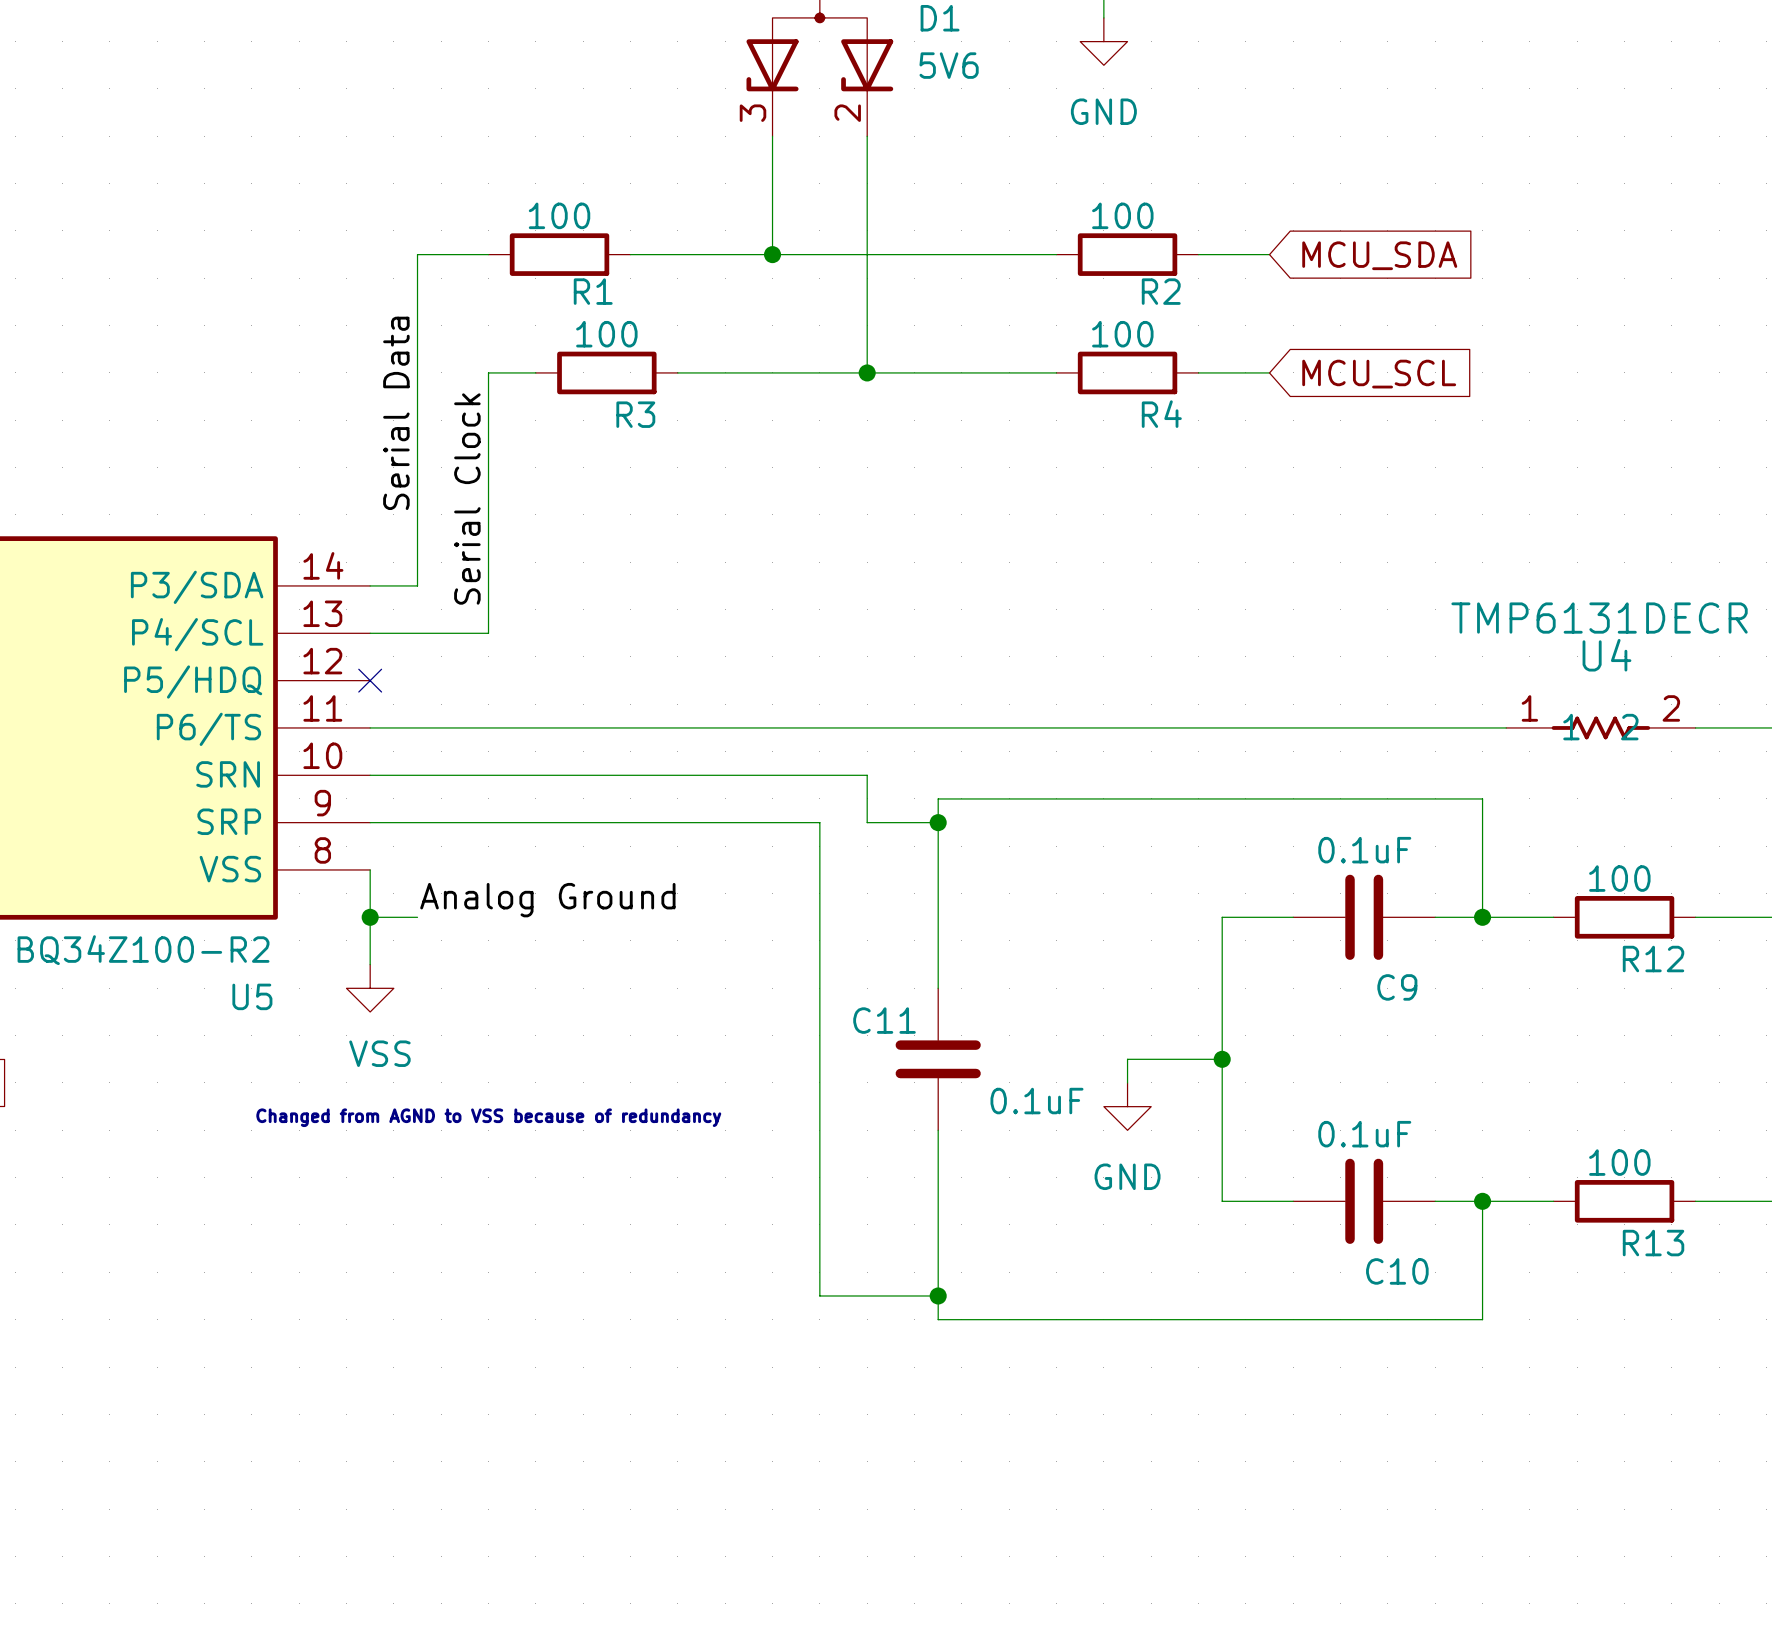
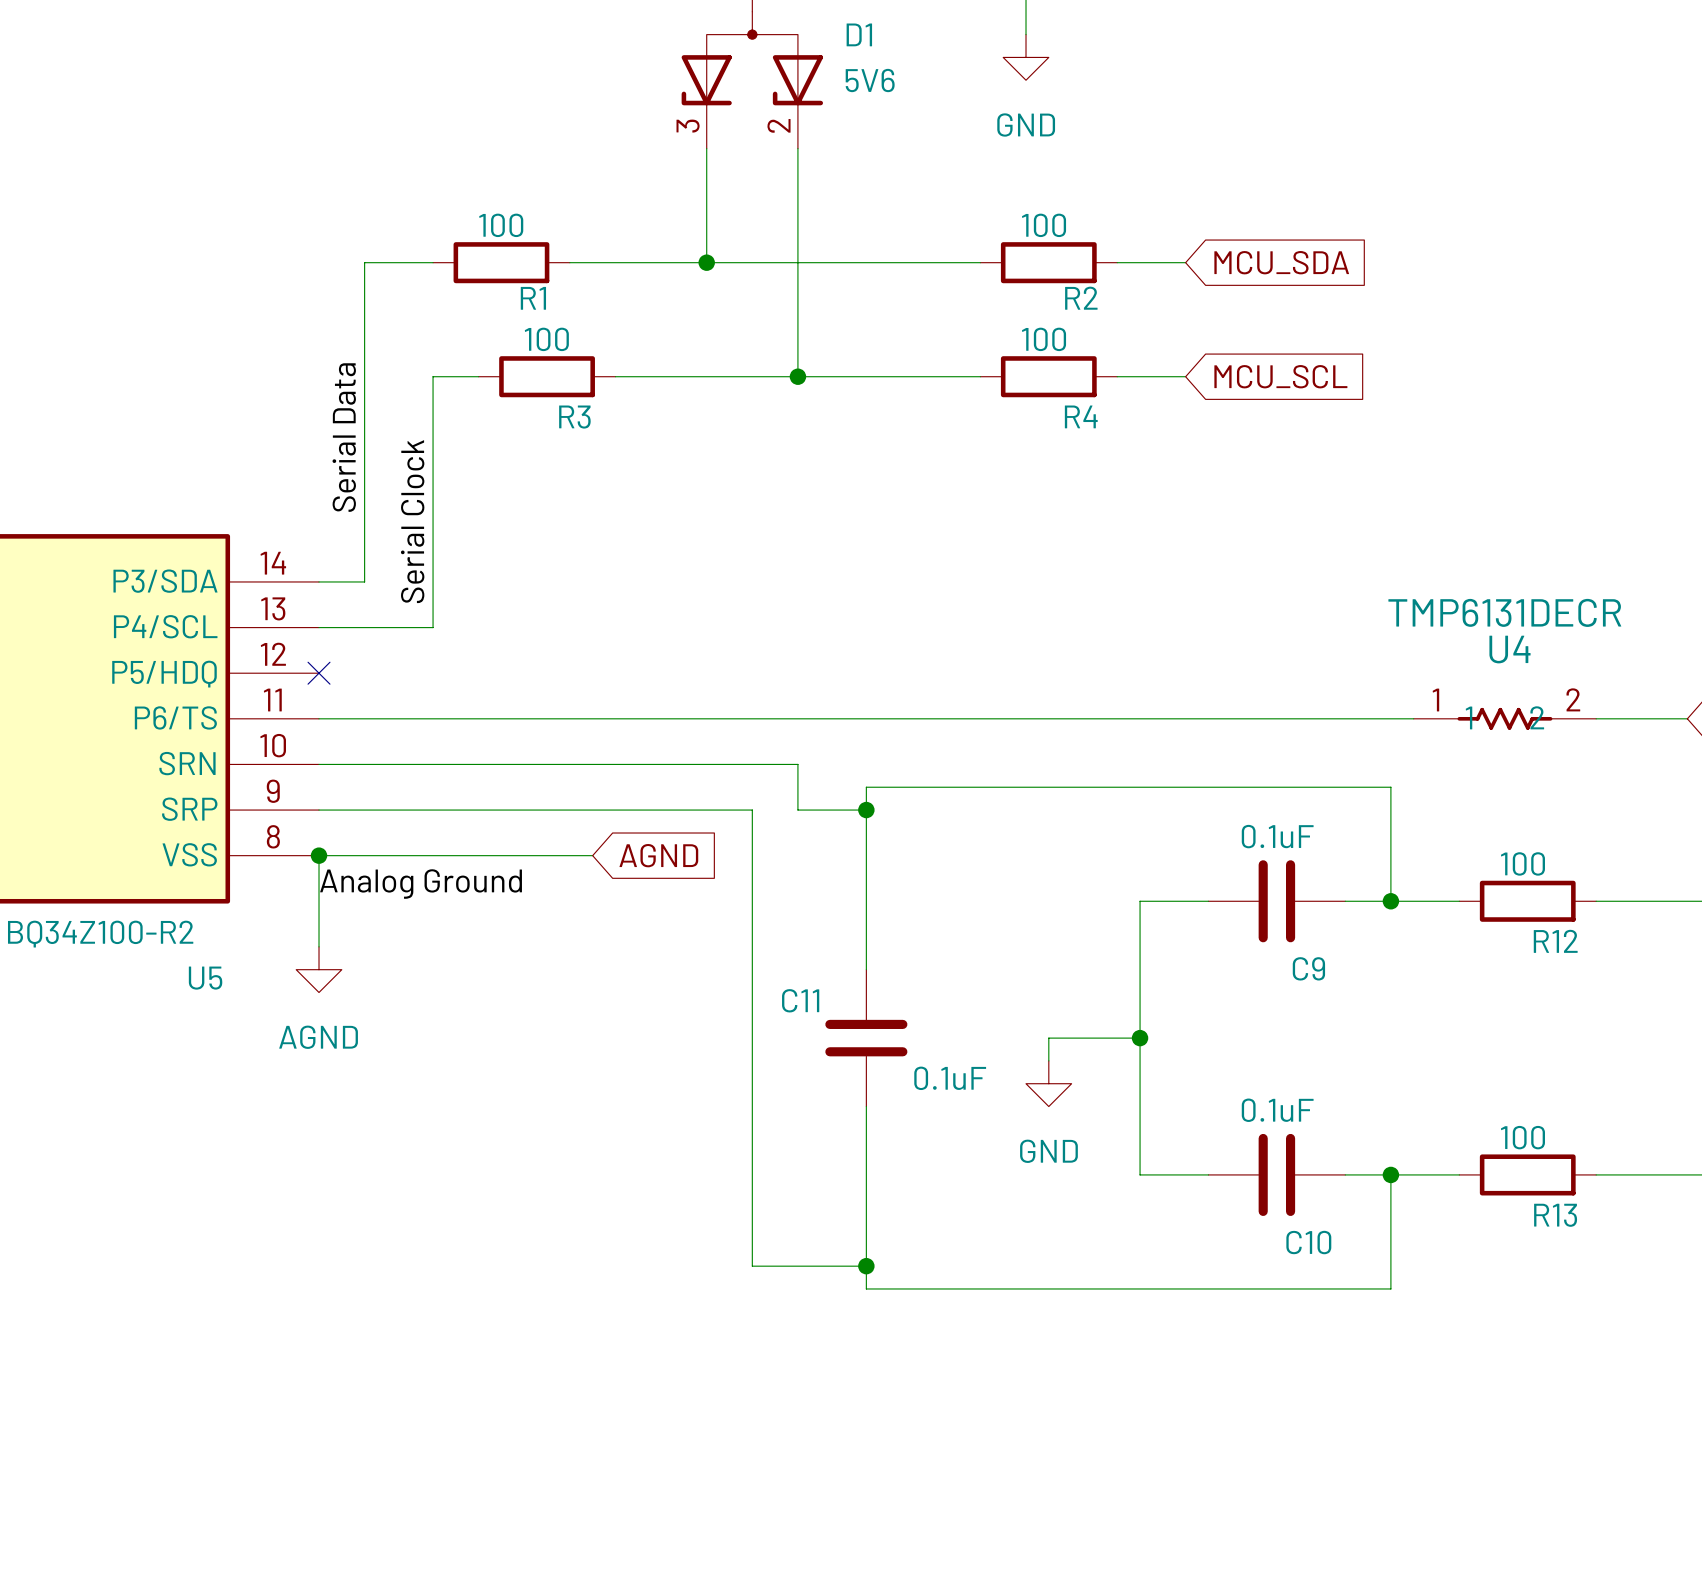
wire: none -> (319, 855) (592, 855)
global label: none -> AGND (658, 855)
label position: Analog Ground (547, 900) -> Analog Ground (421, 884)
wire: (370, 917) (417, 917) -> none
junction position: (370, 917) -> (319, 855)
power symbol: VSS (370, 988) -> AGND (319, 969)
text: Changed from AGND to VSS because of redundancy (488, 1117) -> none

